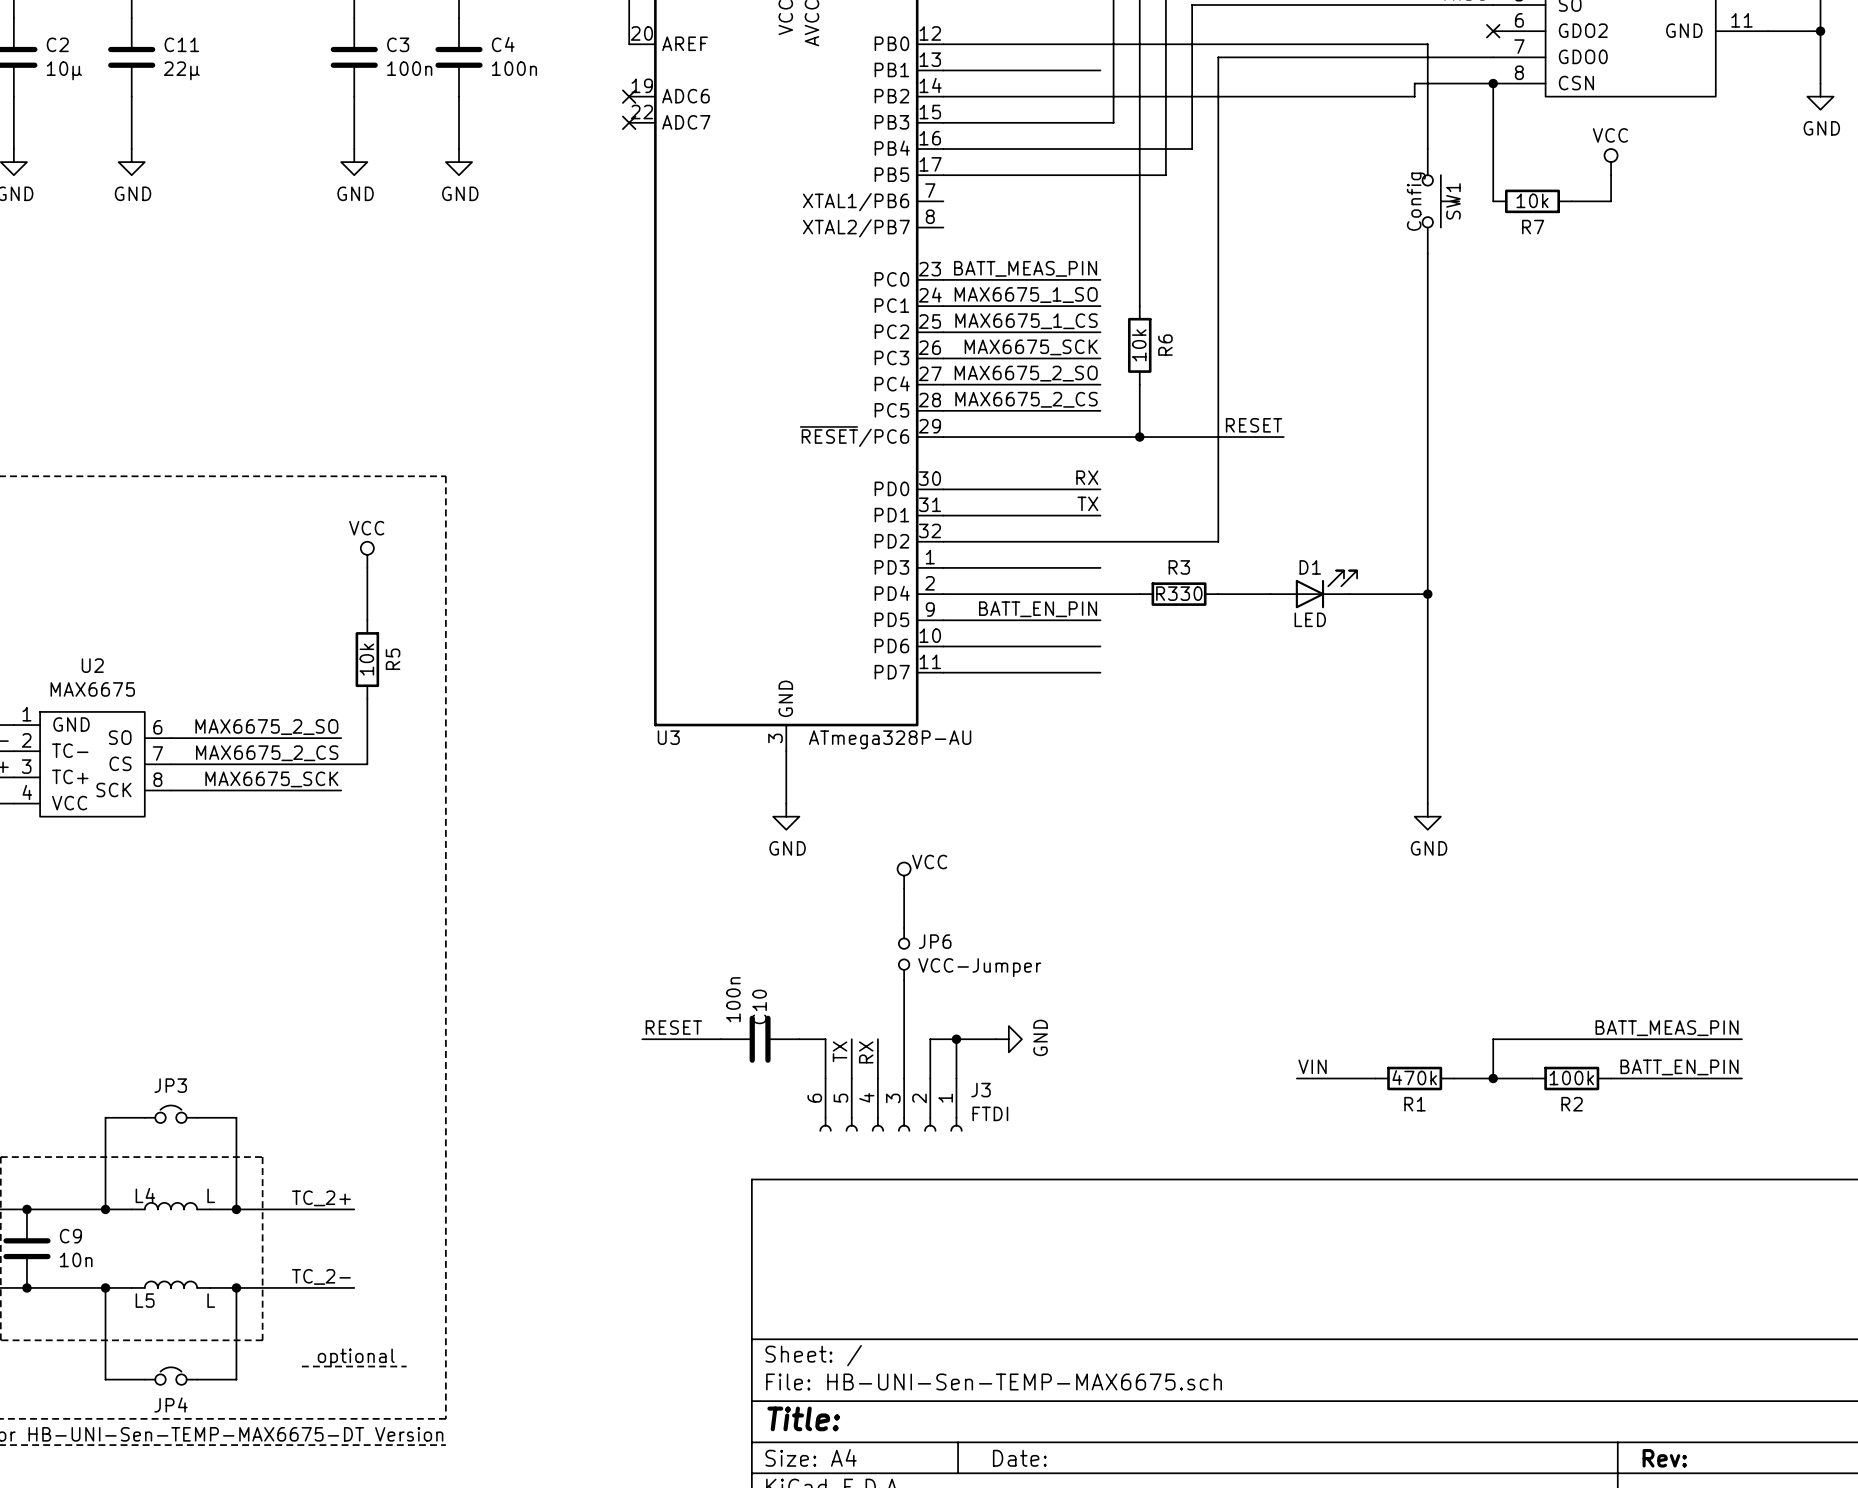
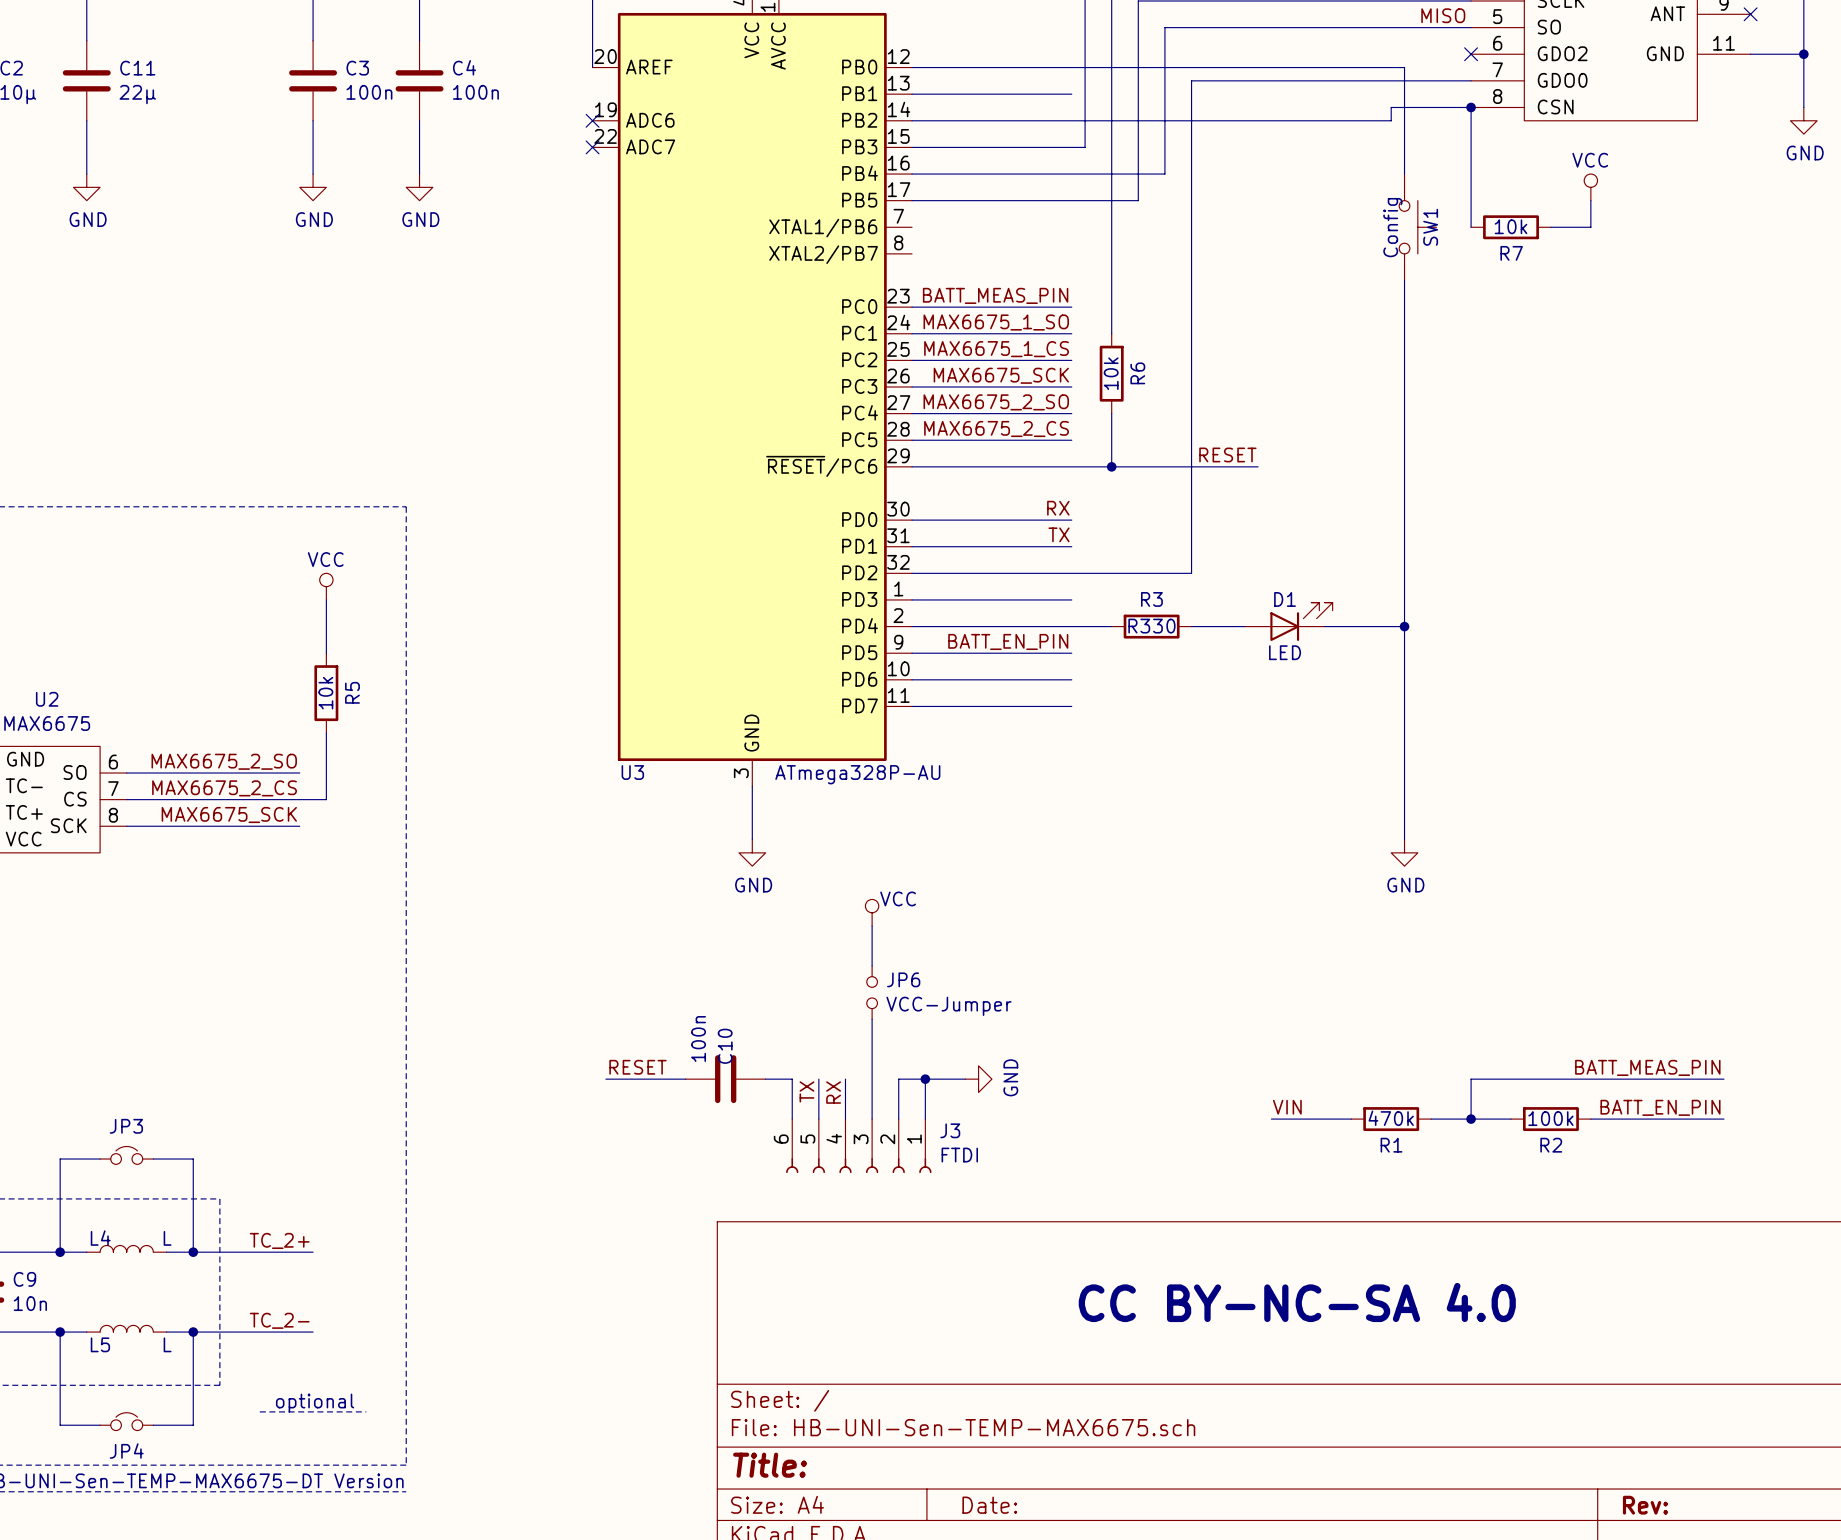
text: none -> CC BY-NC-SA 4.0 (1297, 1302)

